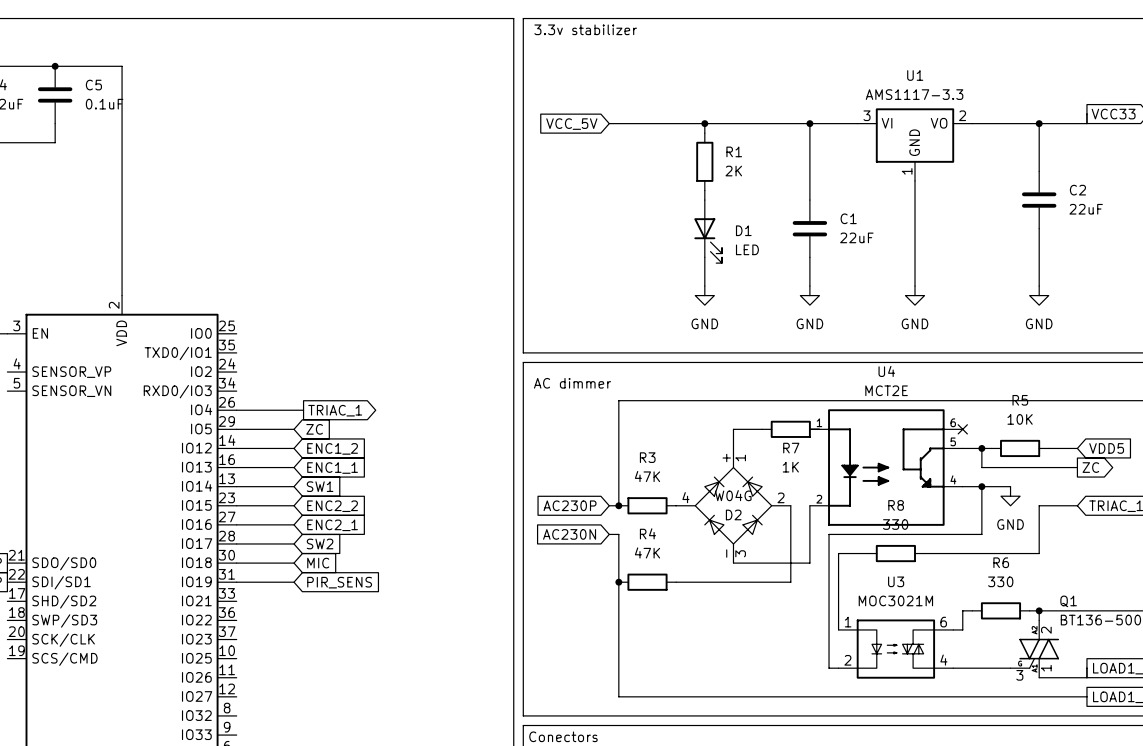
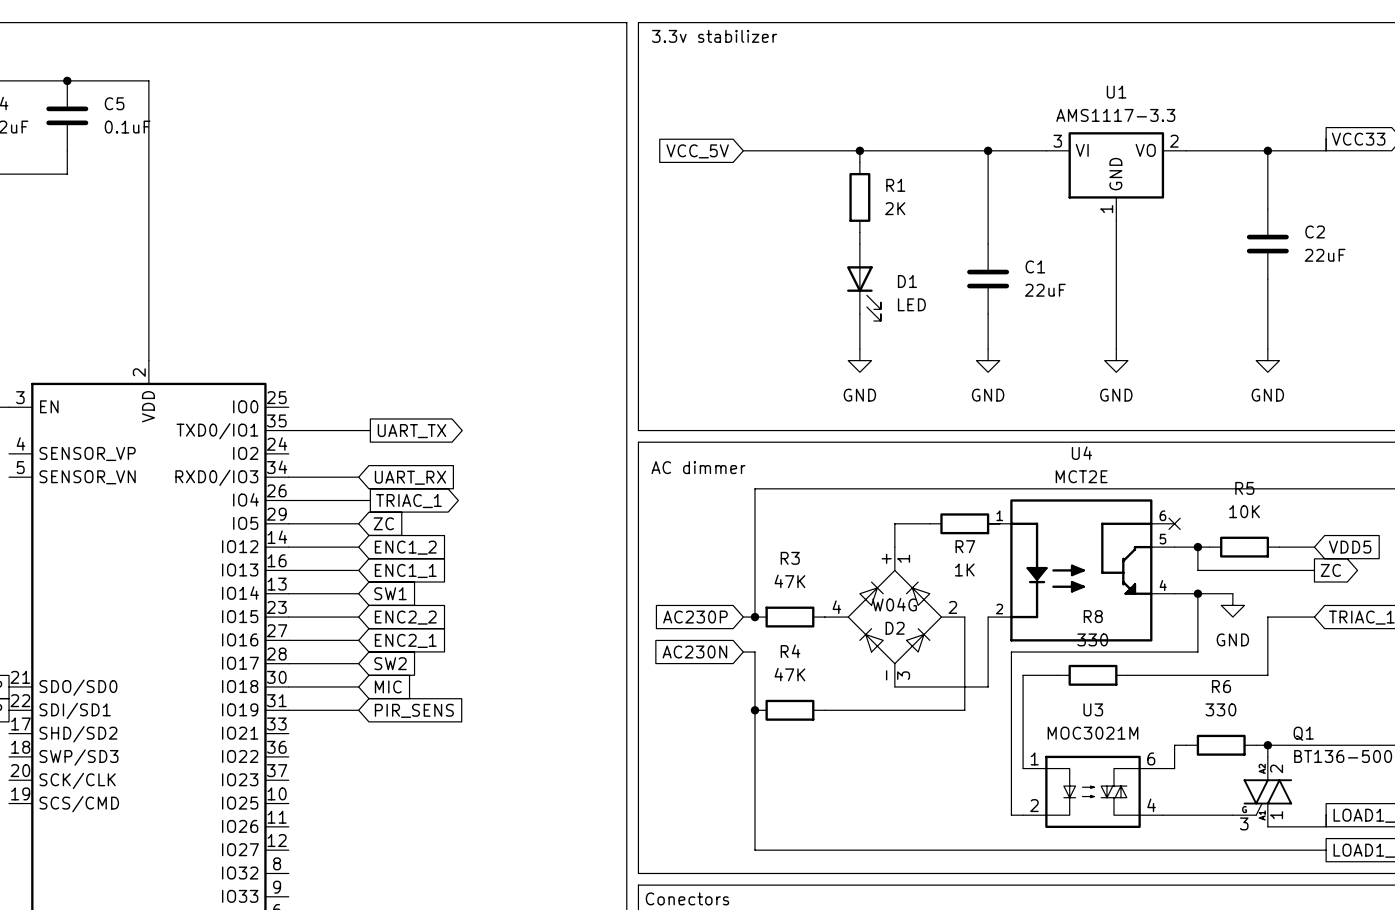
wire: none -> (288, 430) (370, 430)
global label: none -> UART_TX (411, 431)
wire: none -> (288, 477) (358, 477)
global label: none -> UART_RX (410, 477)

